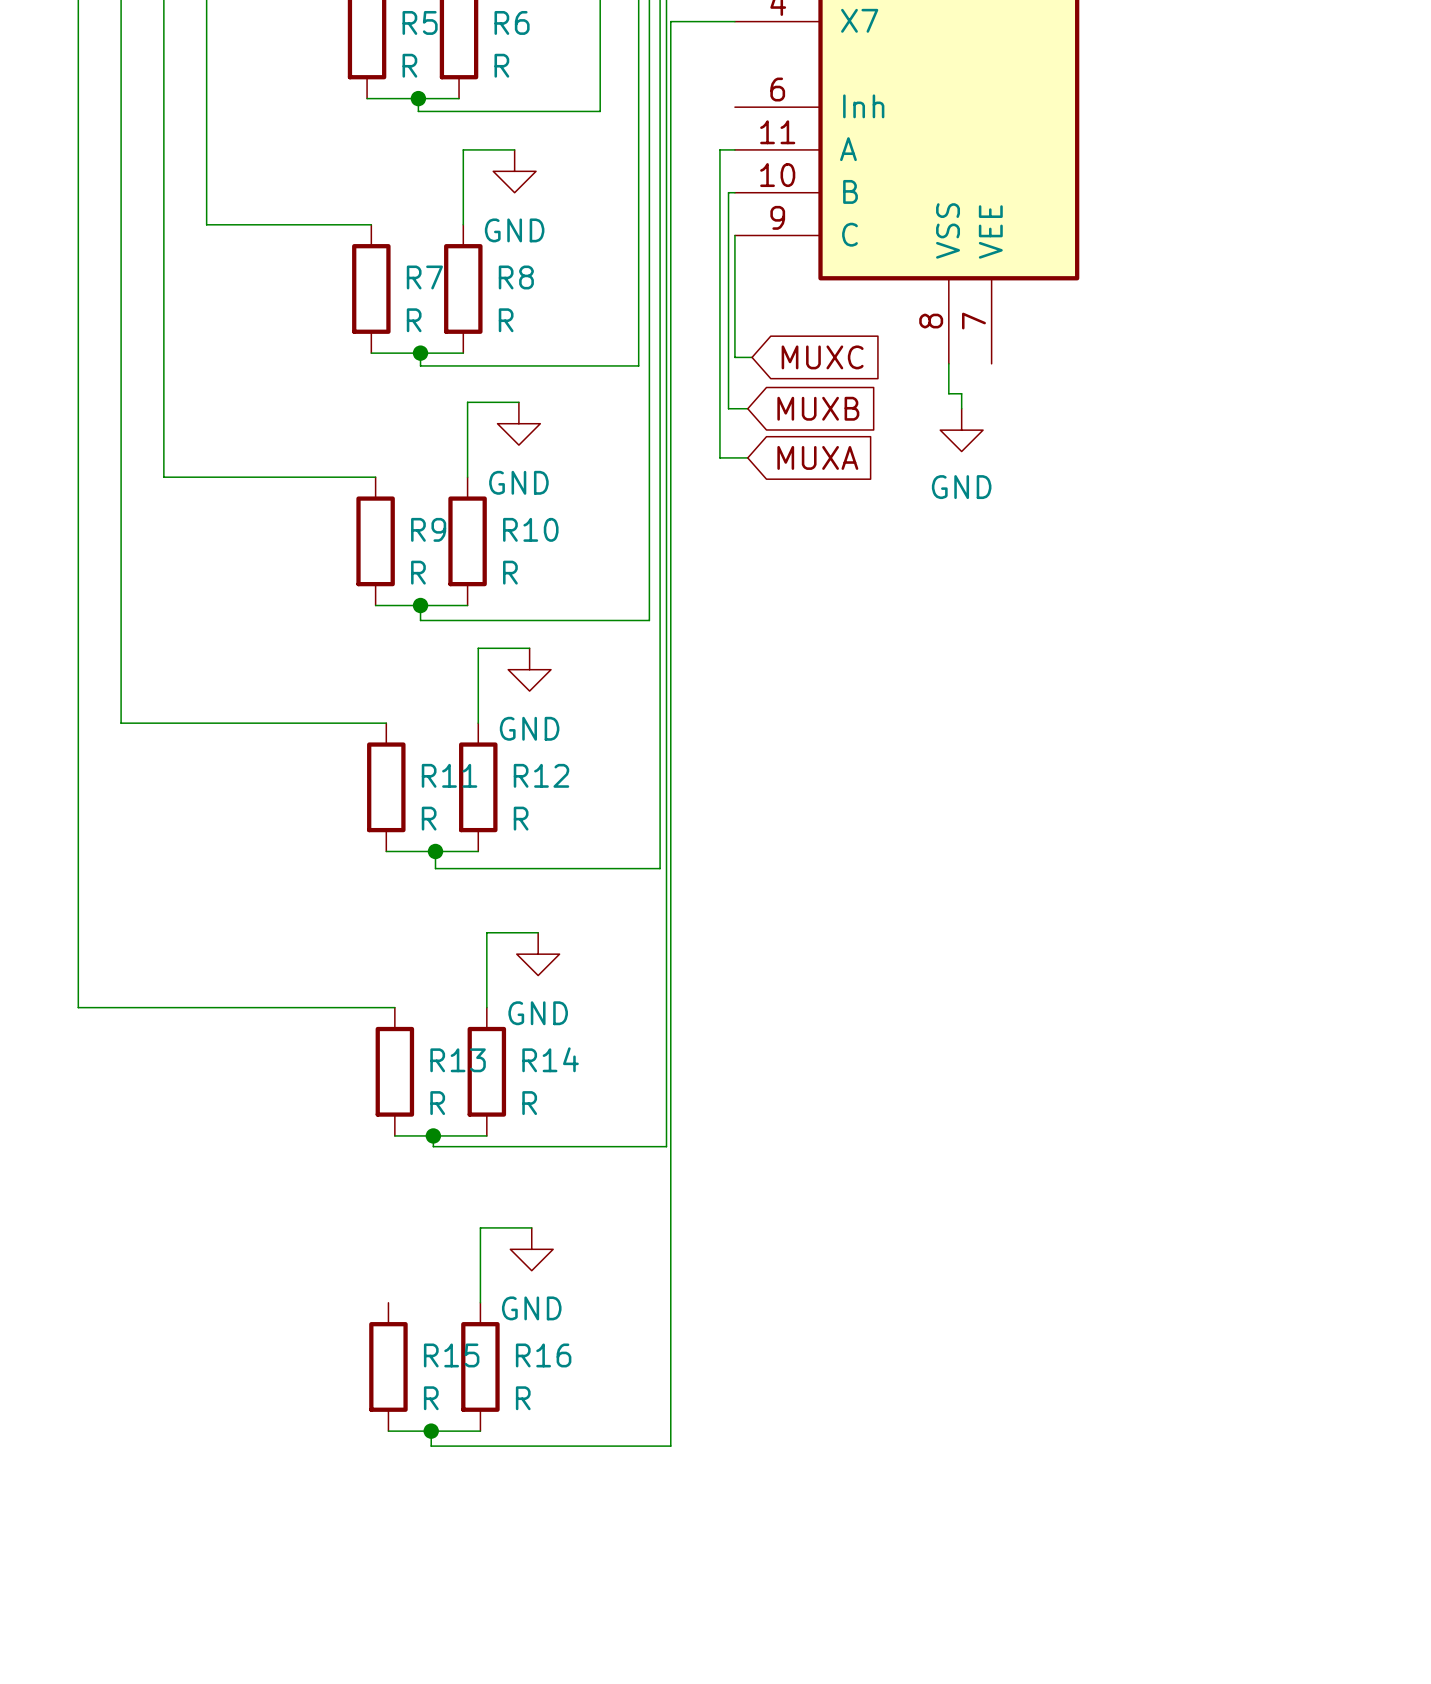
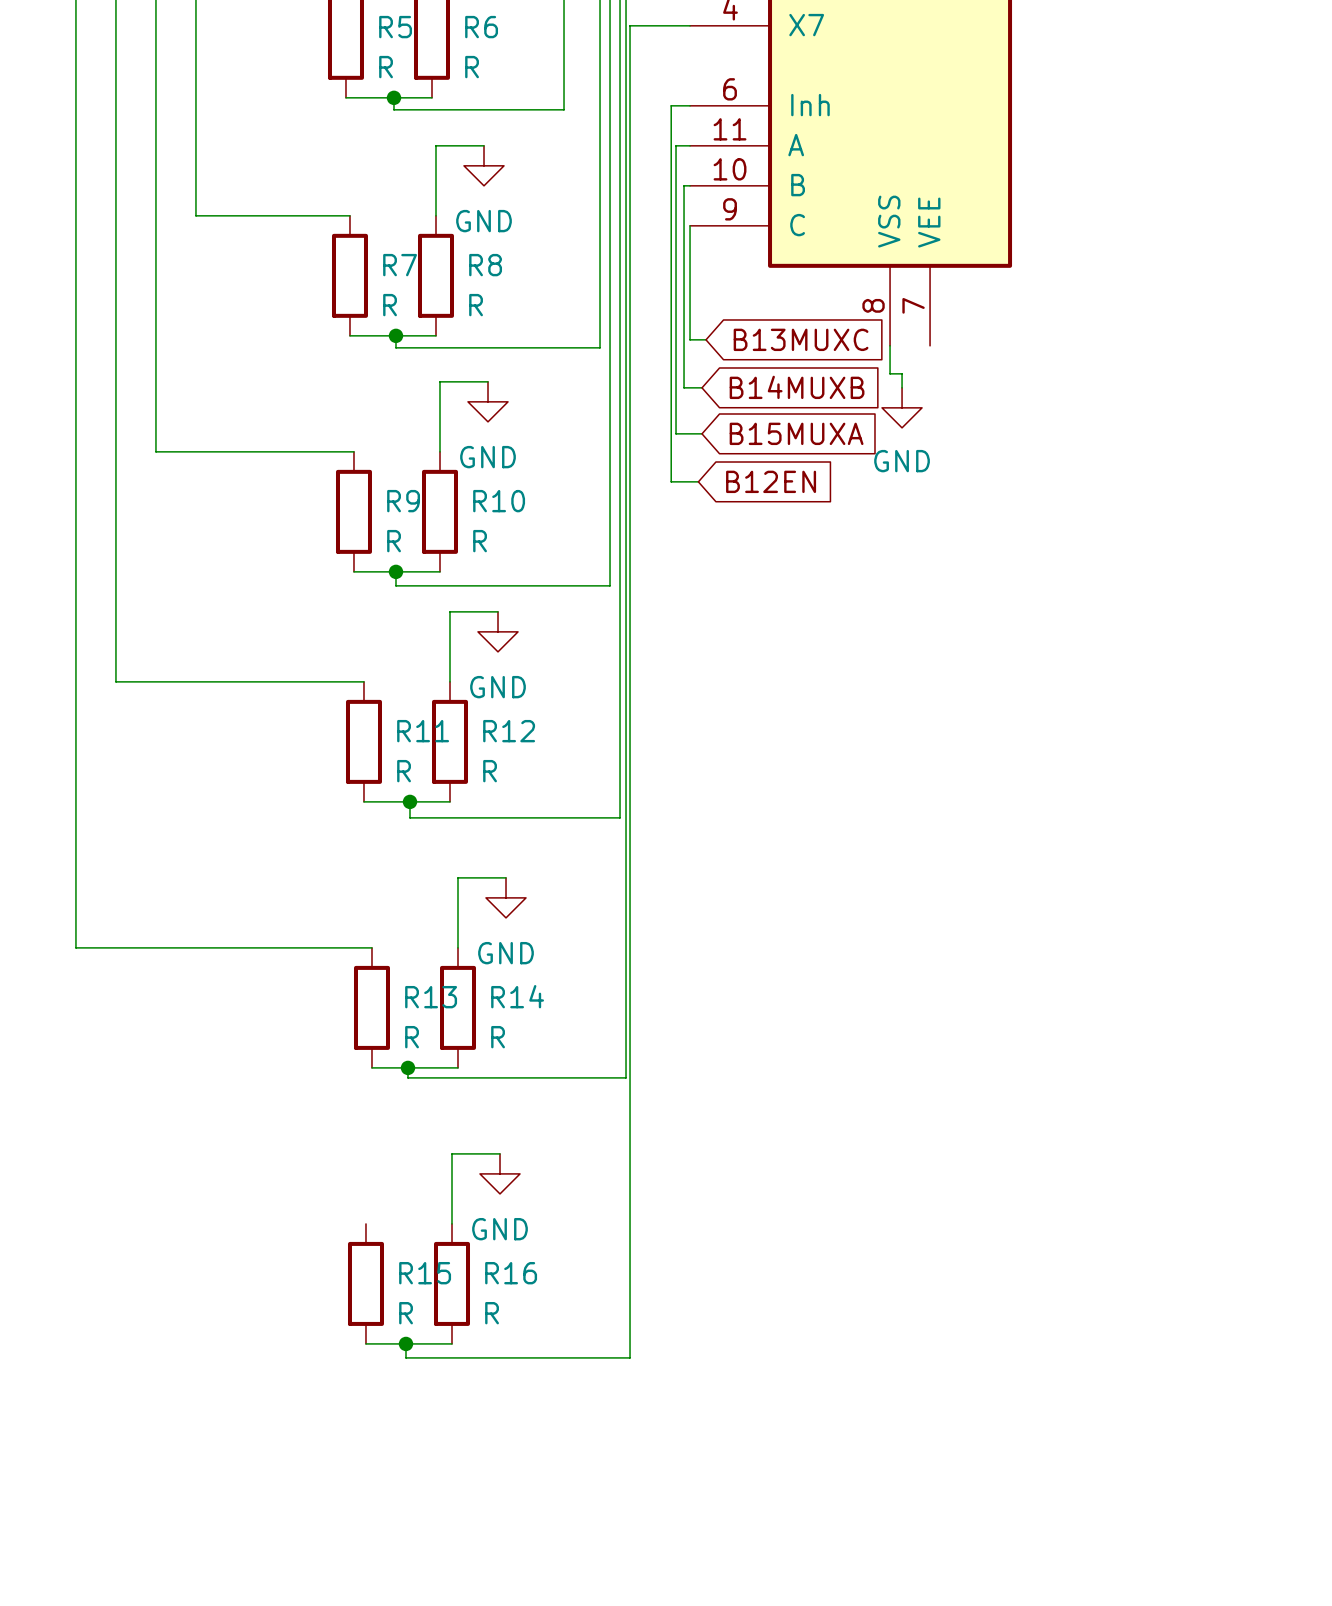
wire: none -> (690, 105) (671, 105) (671, 481) (698, 481)
global label: MUXC (822, 357) -> B13MUXC (801, 339)
global label: MUXB (818, 408) -> B14MUXB (797, 387)
global label: MUXA (817, 457) -> B15MUXA (796, 433)
global label: none -> B12EN (771, 481)

